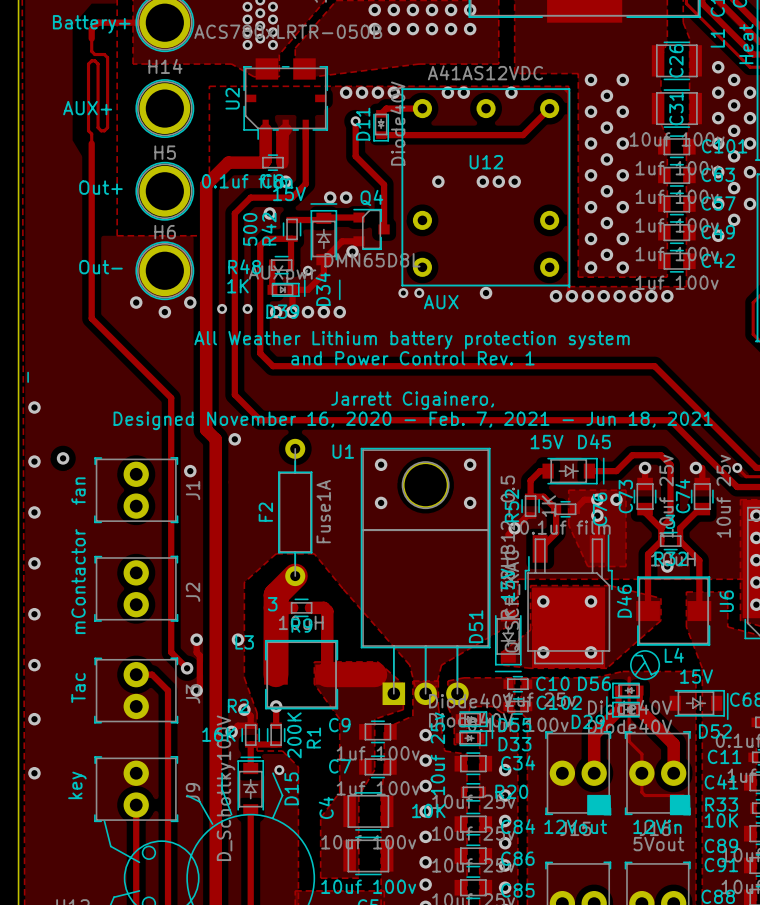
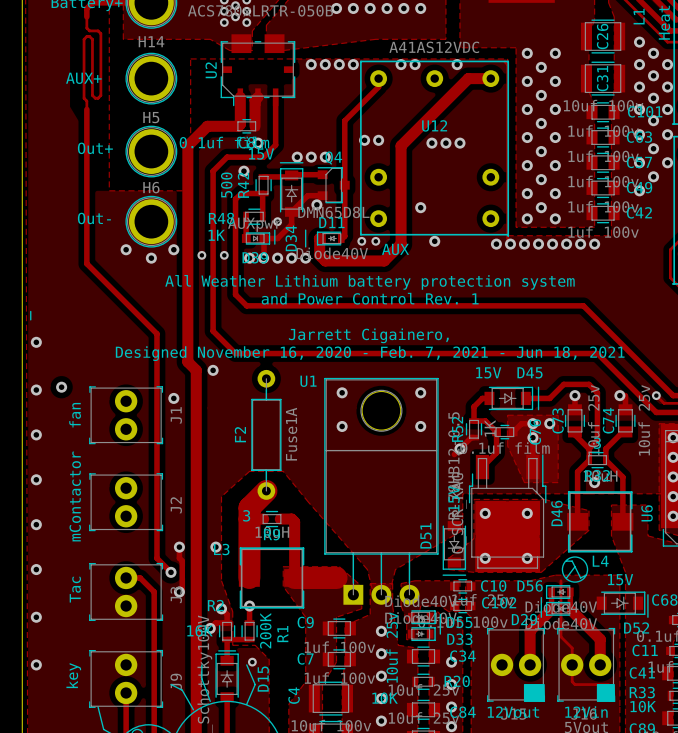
track: (422, 108) (386, 108) (381, 113) -> none
track: (549, 108) (523, 135) (381, 135) -> (490, 78) (468, 78) (401, 145) (401, 244) (384, 260) (325, 260) (319, 255) (319, 238)
track: (355, 121) (355, 156) (384, 184) -> (378, 78) (378, 87) (344, 120) (344, 145)
via: (355, 121) -> none
D11 rotation: 0° (381, 125) -> 90° clockwise (330, 238)
D11 position: (381, 125) -> (330, 238)
via: none -> (364, 140)
via: none -> (378, 140)
via: (438, 181) -> none
via: none -> (325, 157)
track: none -> (344, 185) (344, 236) (342, 238)
via: none -> (420, 207)

